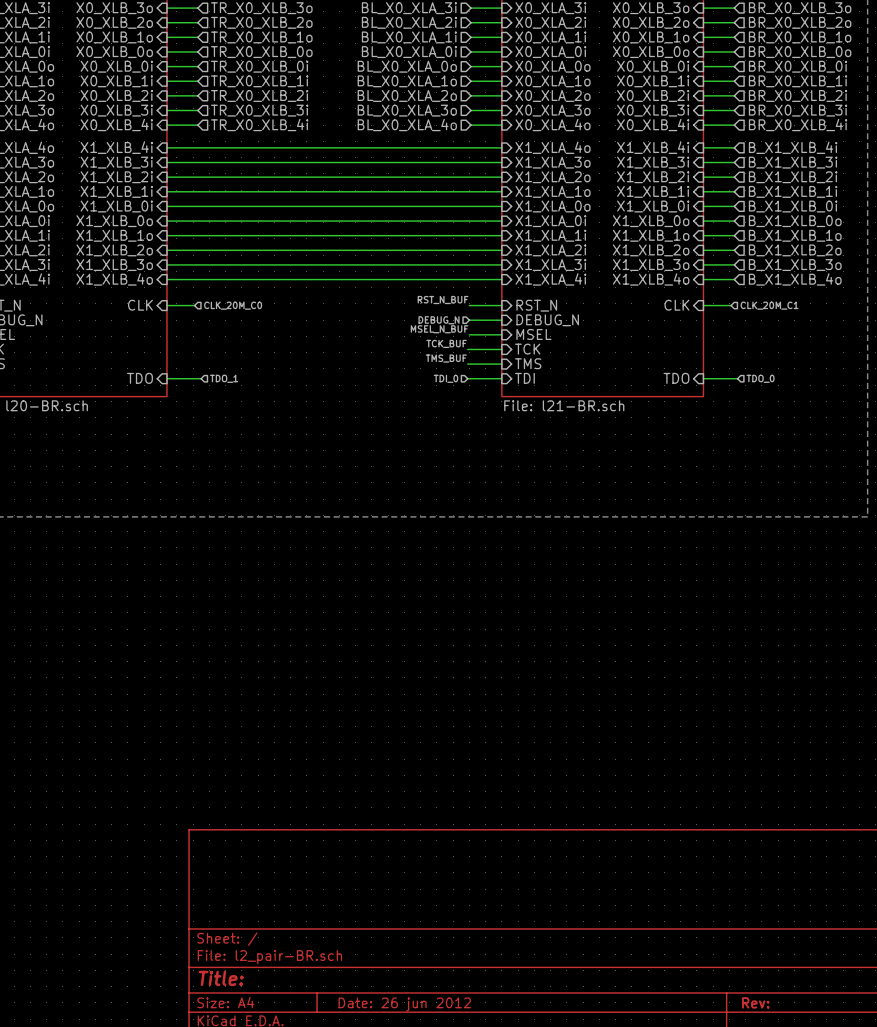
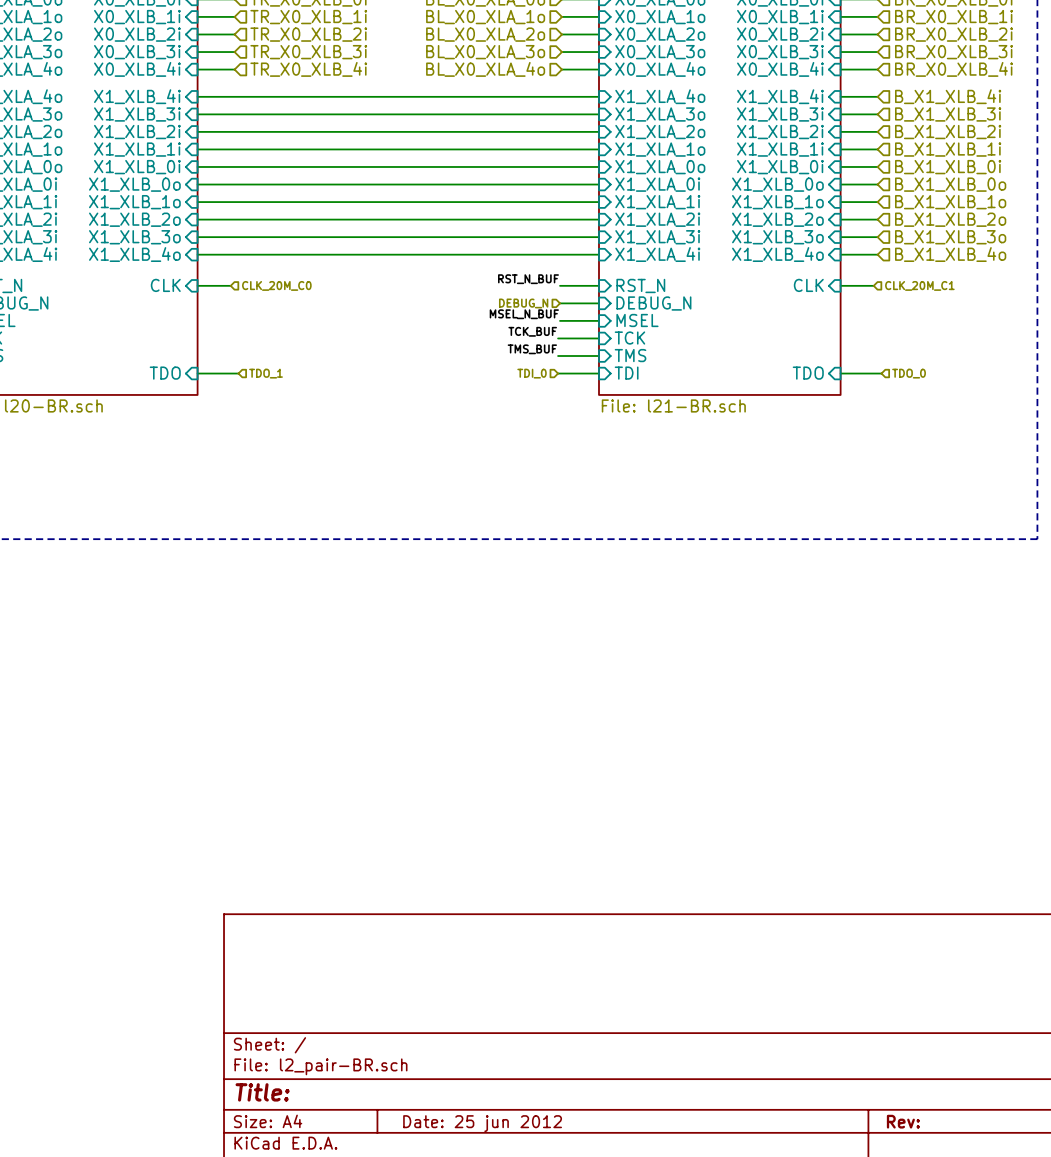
title block: Date: 26 jun 2012 (404, 1004) -> Date: 25 jun 2012 (482, 1123)

